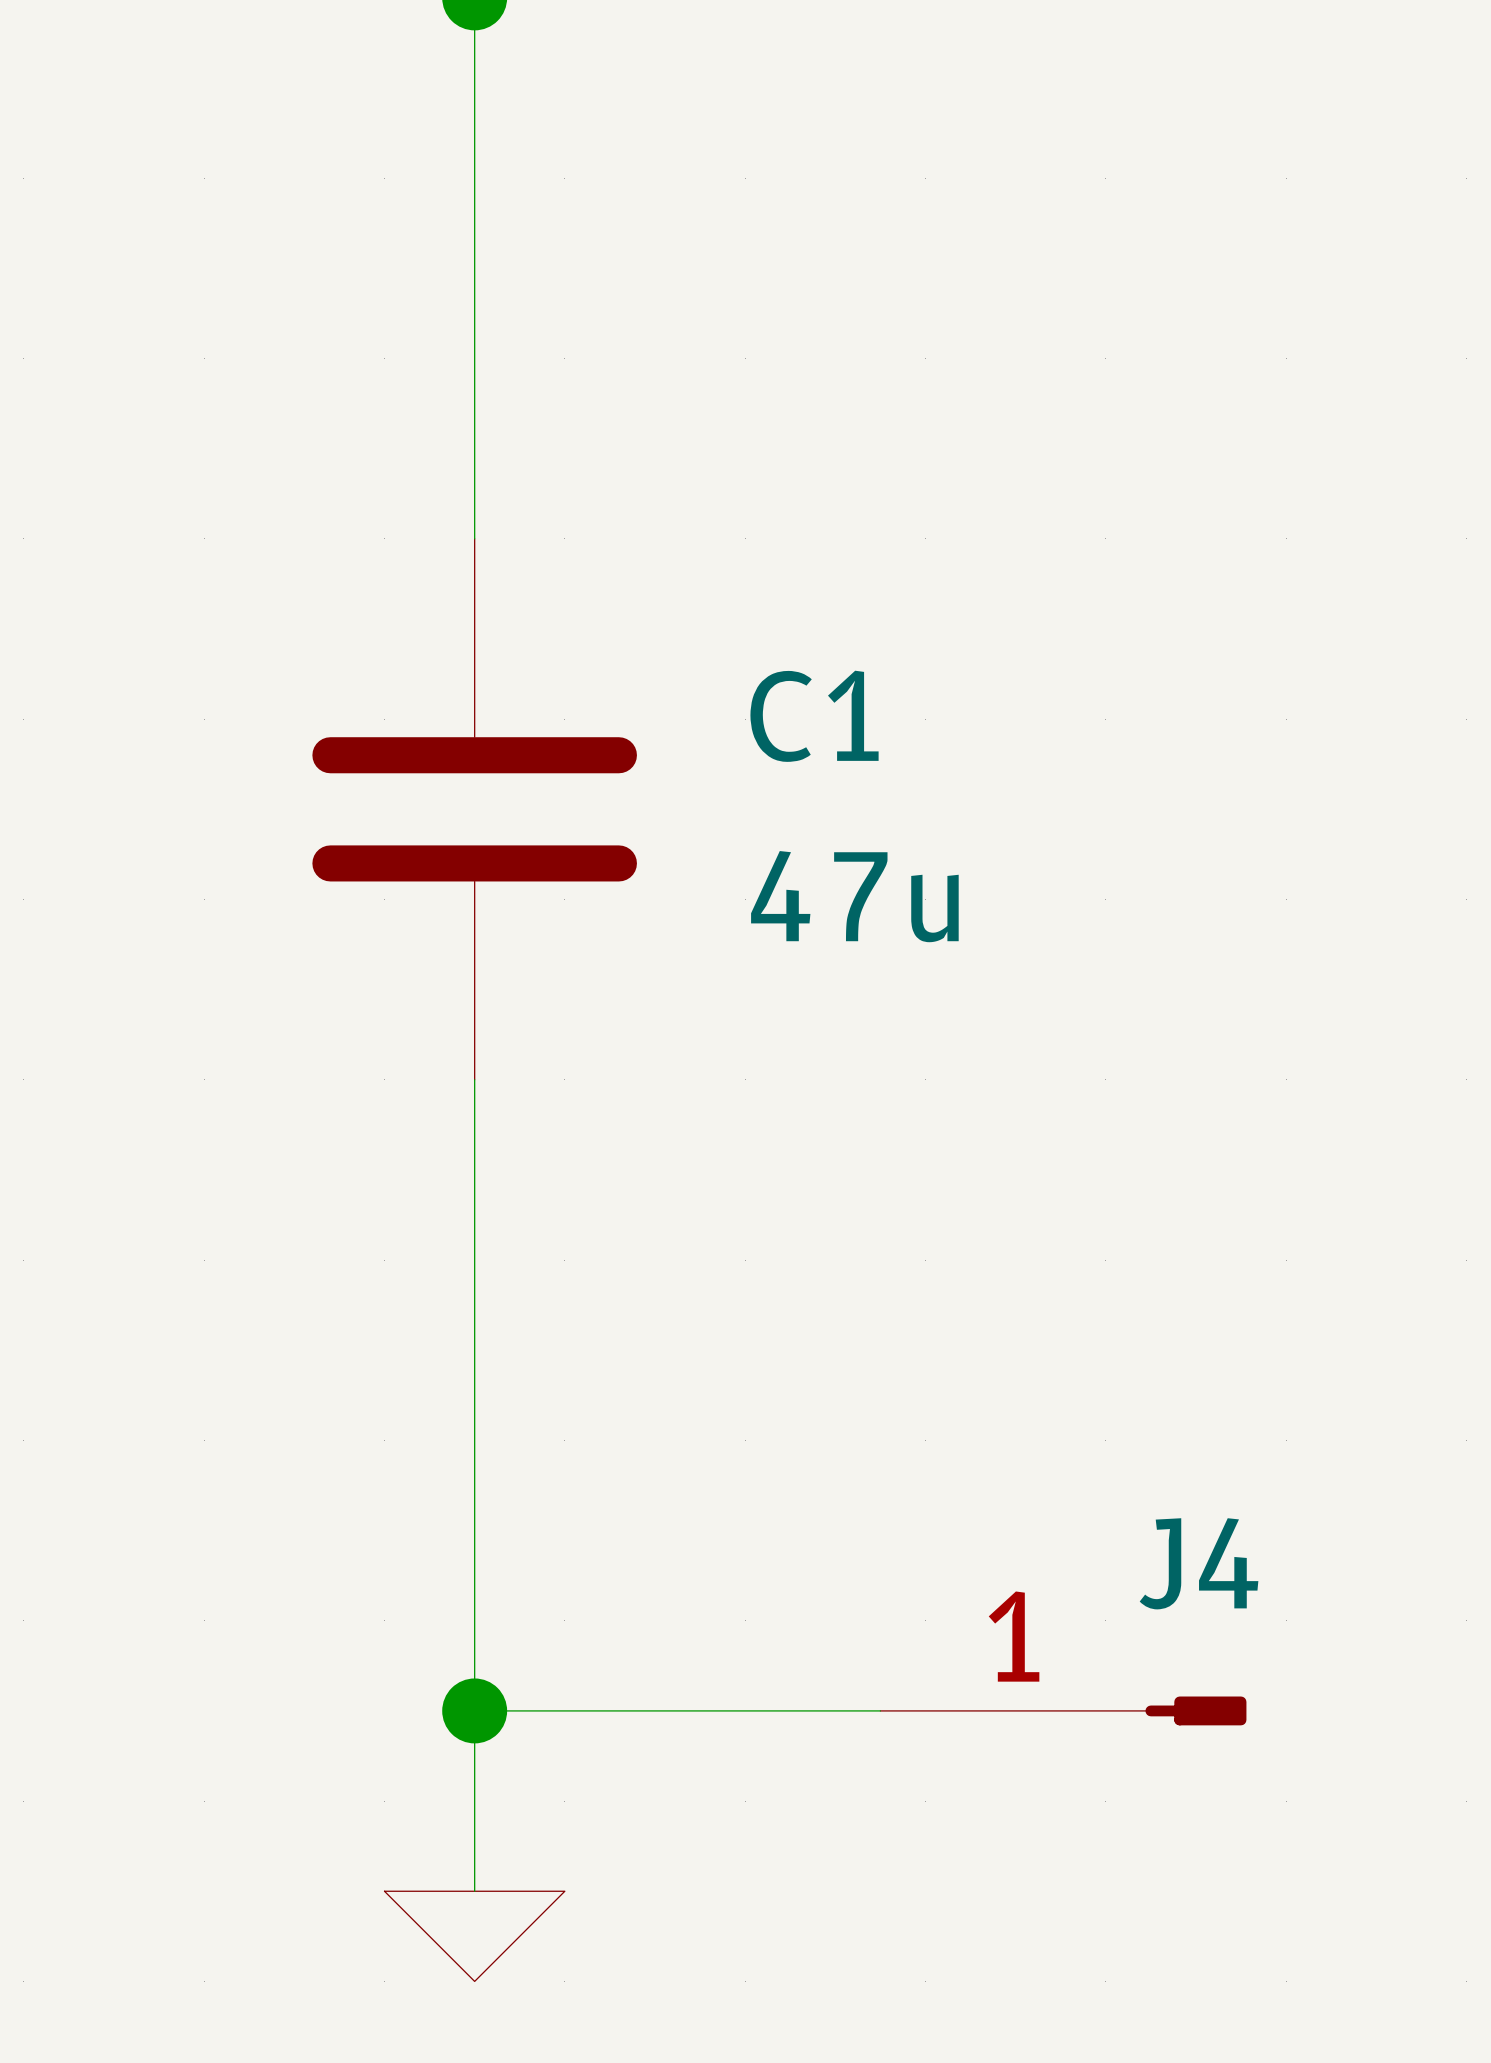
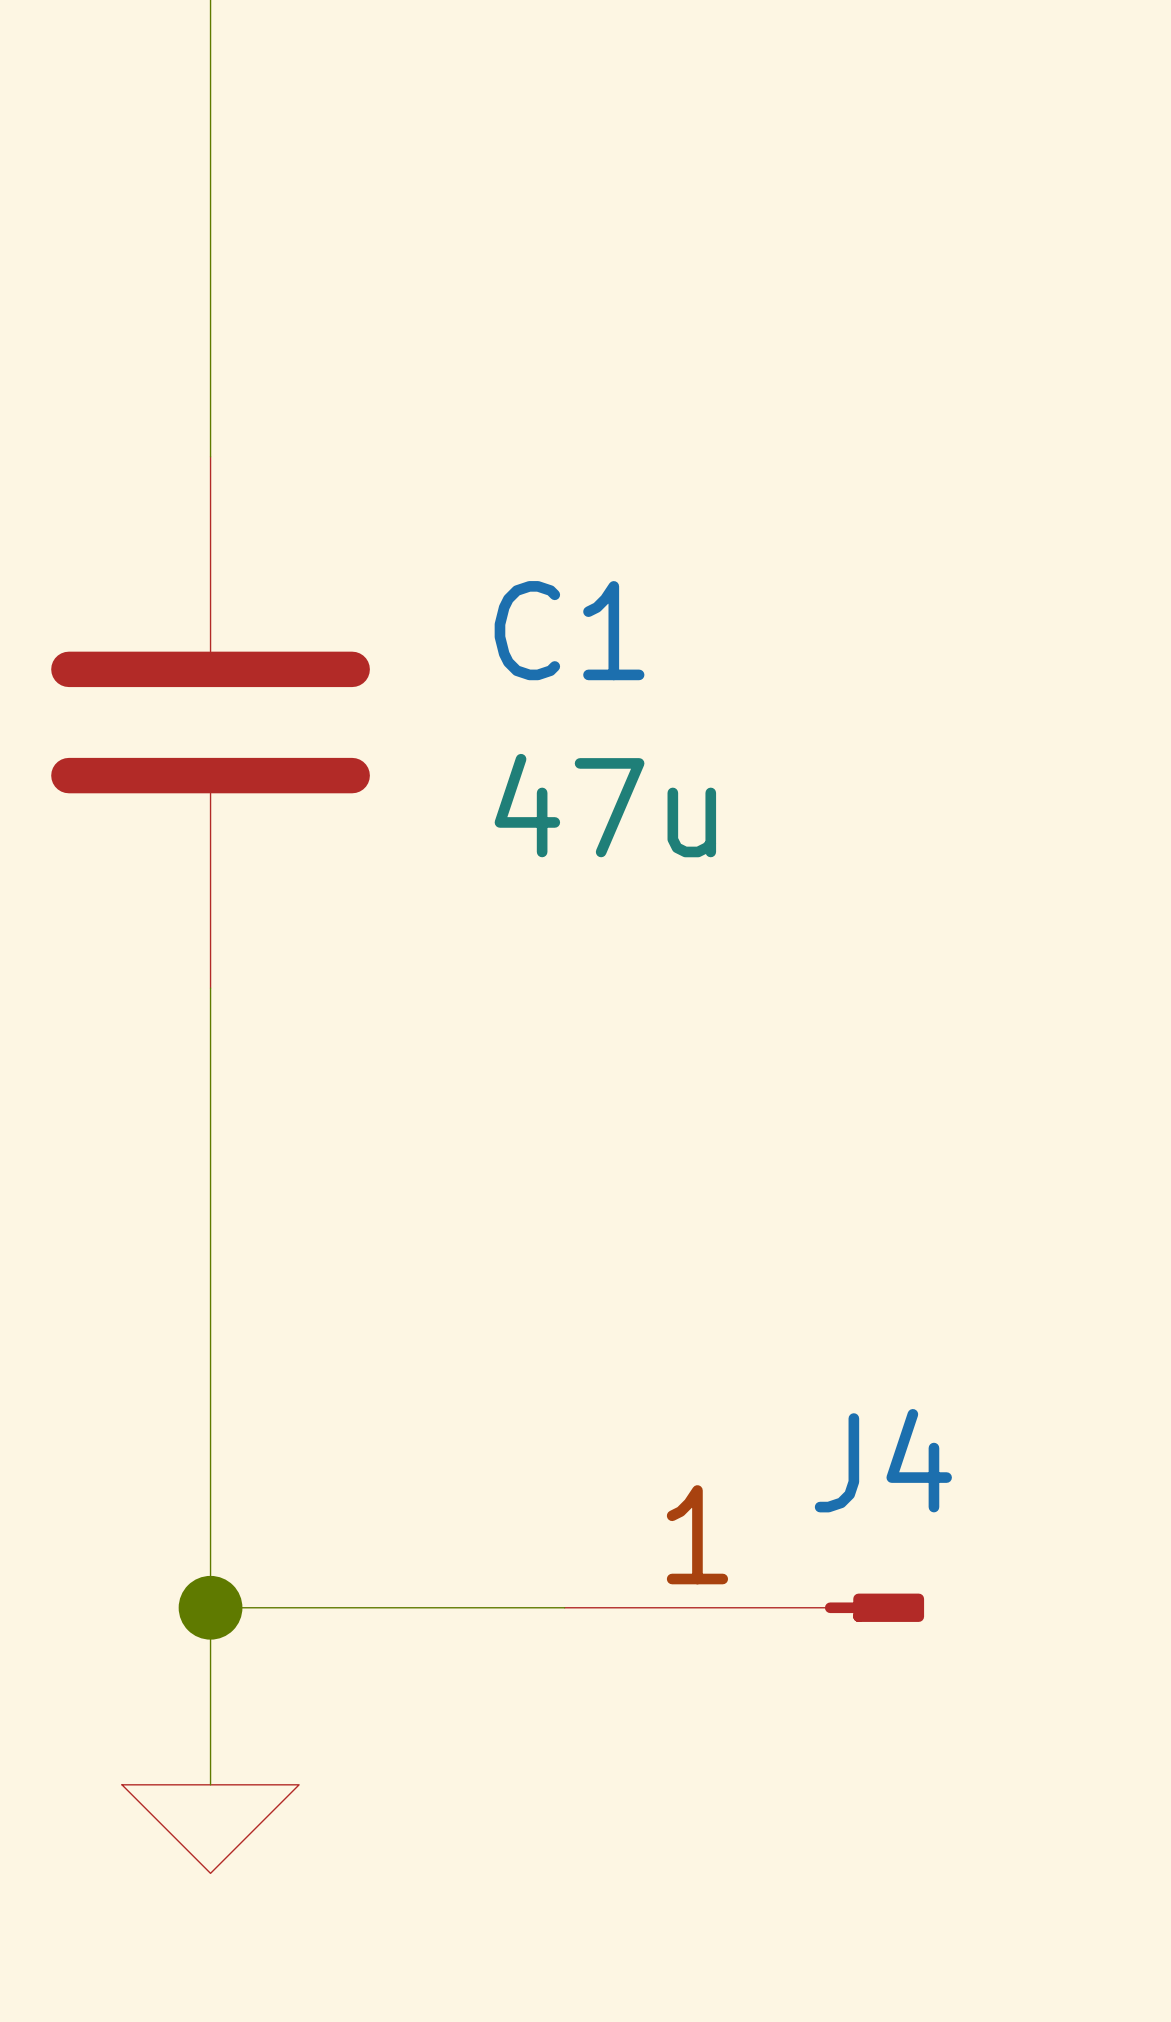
J4 position: (1063, 1710) -> (744, 1607)

